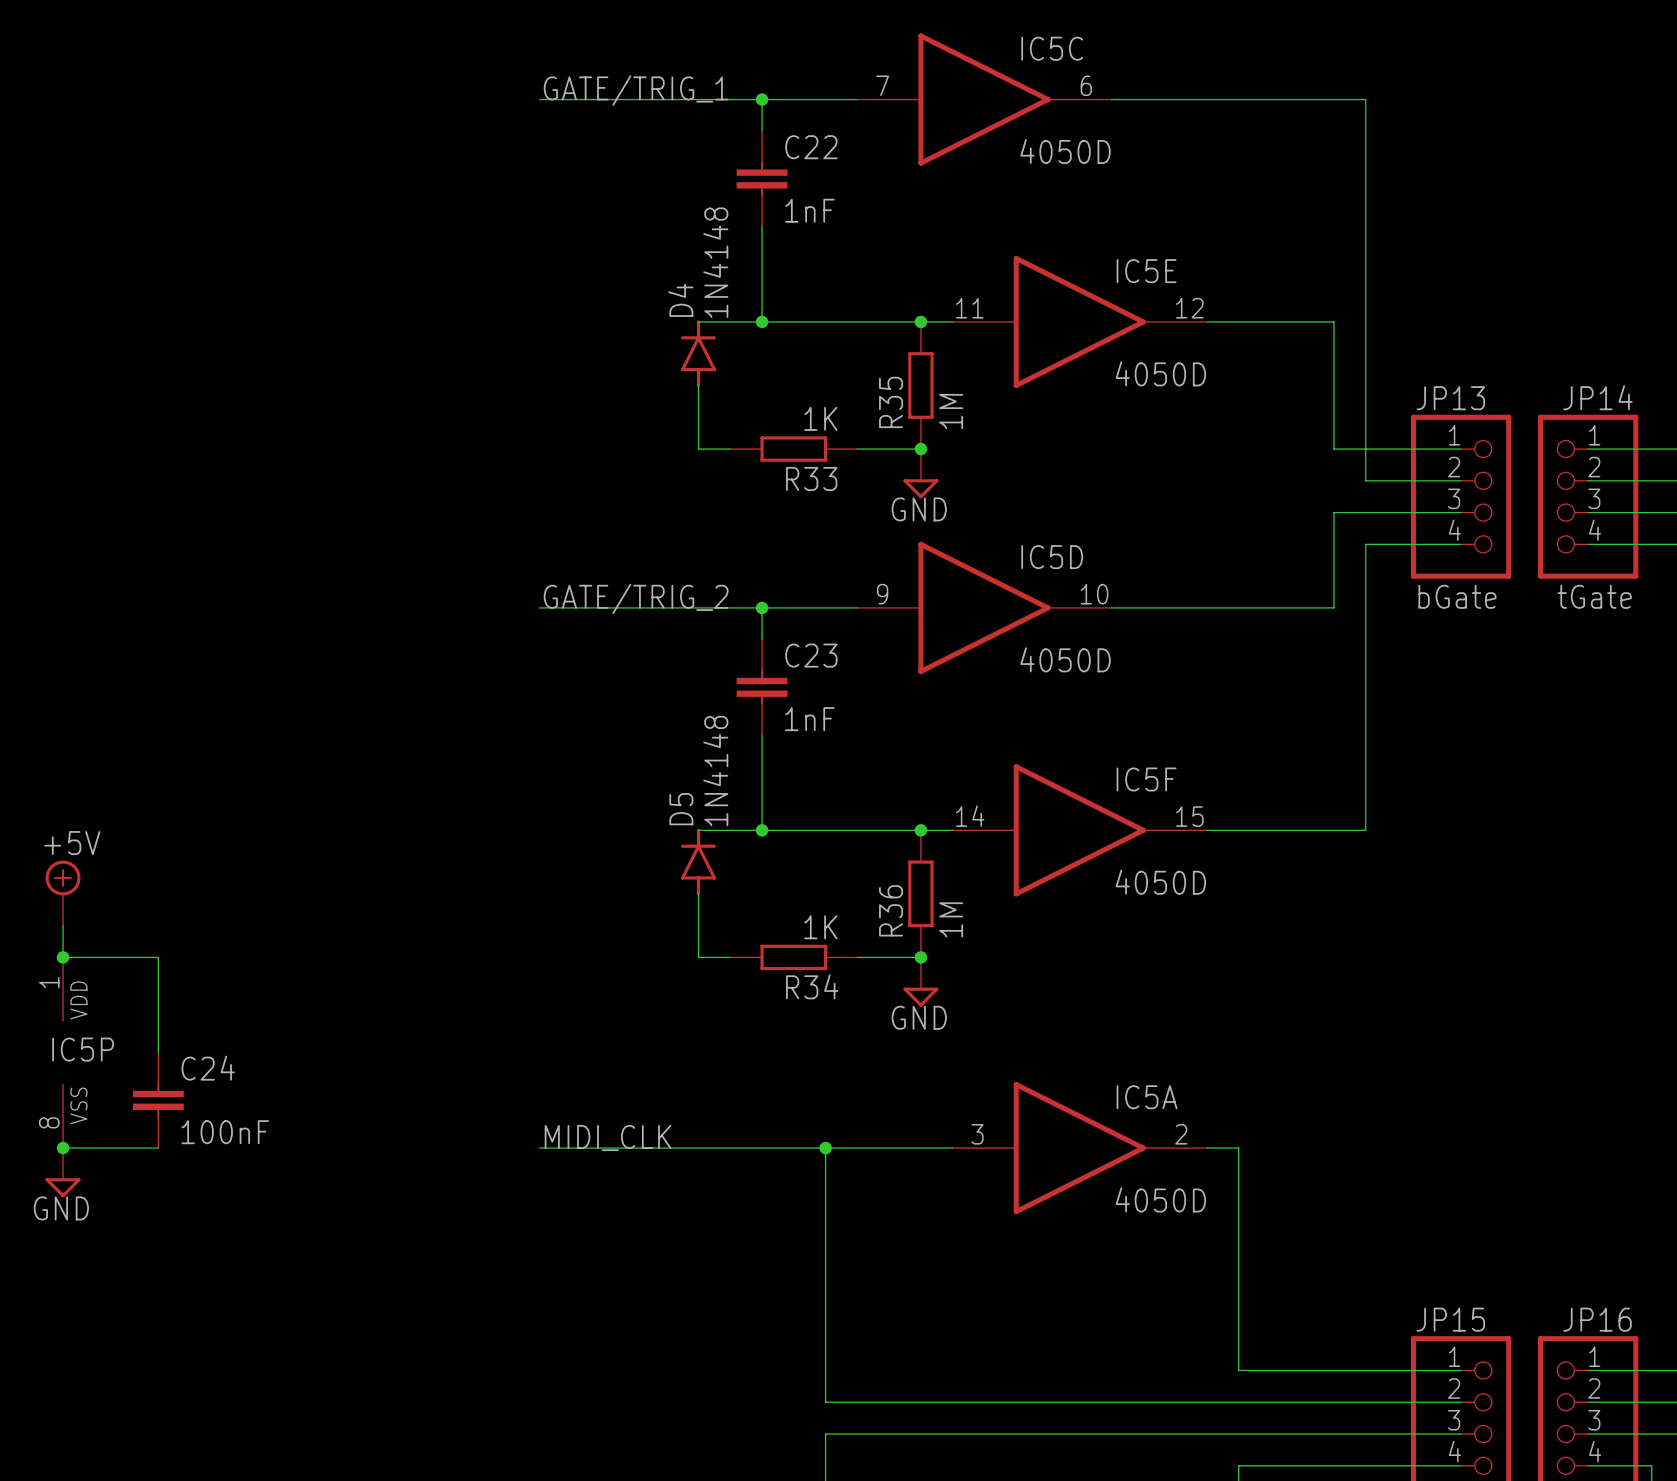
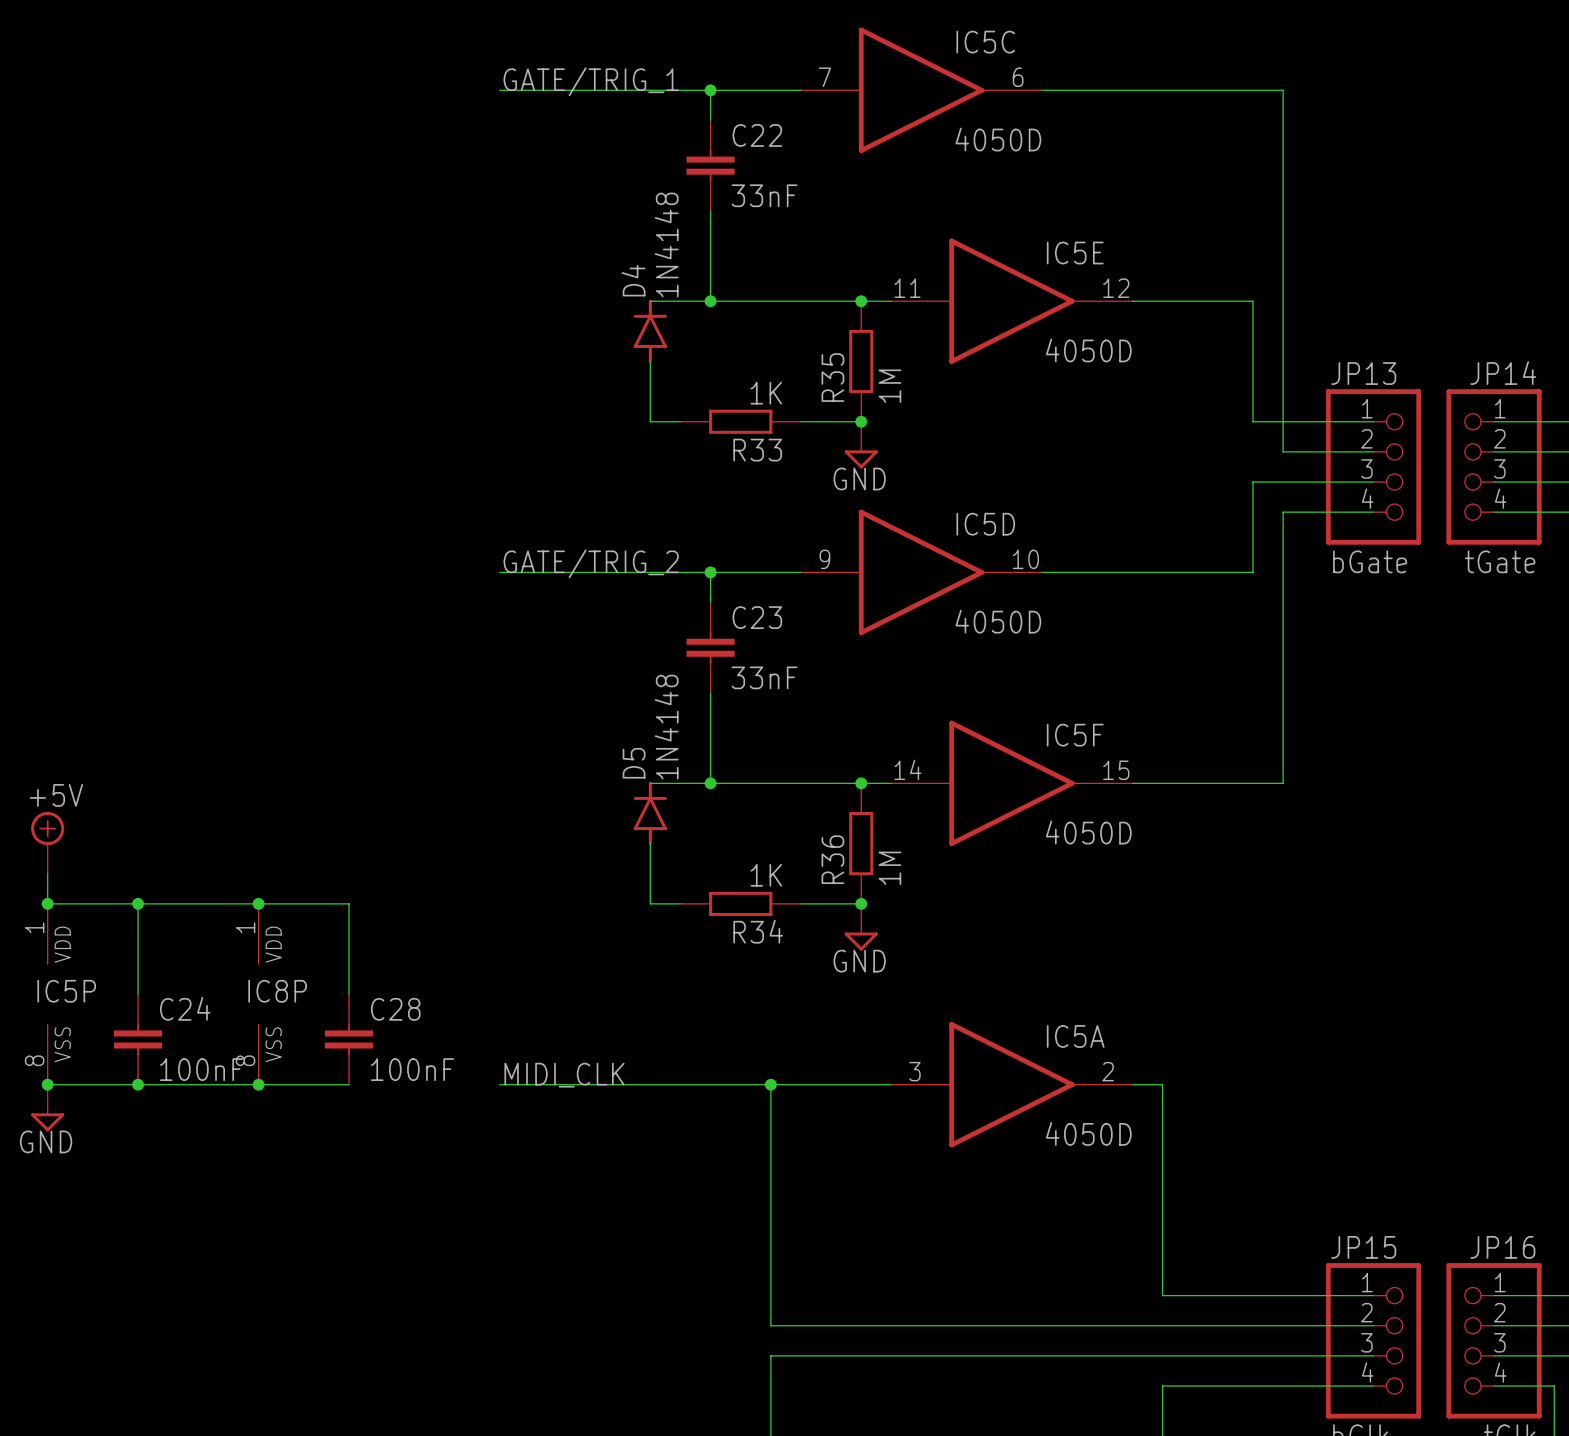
C22 value: 1nF (809, 210) -> 33nF (764, 195)
C23 value: 1nF (809, 719) -> 33nF (764, 677)
wire: none -> (138, 903) (349, 903) (349, 994)
junction: none -> (138, 903)
junction: none -> (258, 903)
IC8P: none -> (258, 994)
C28: none -> 100nF (349, 1039)
wire: none -> (138, 1084) (349, 1084)
junction: none -> (138, 1084)
junction: none -> (258, 1084)

